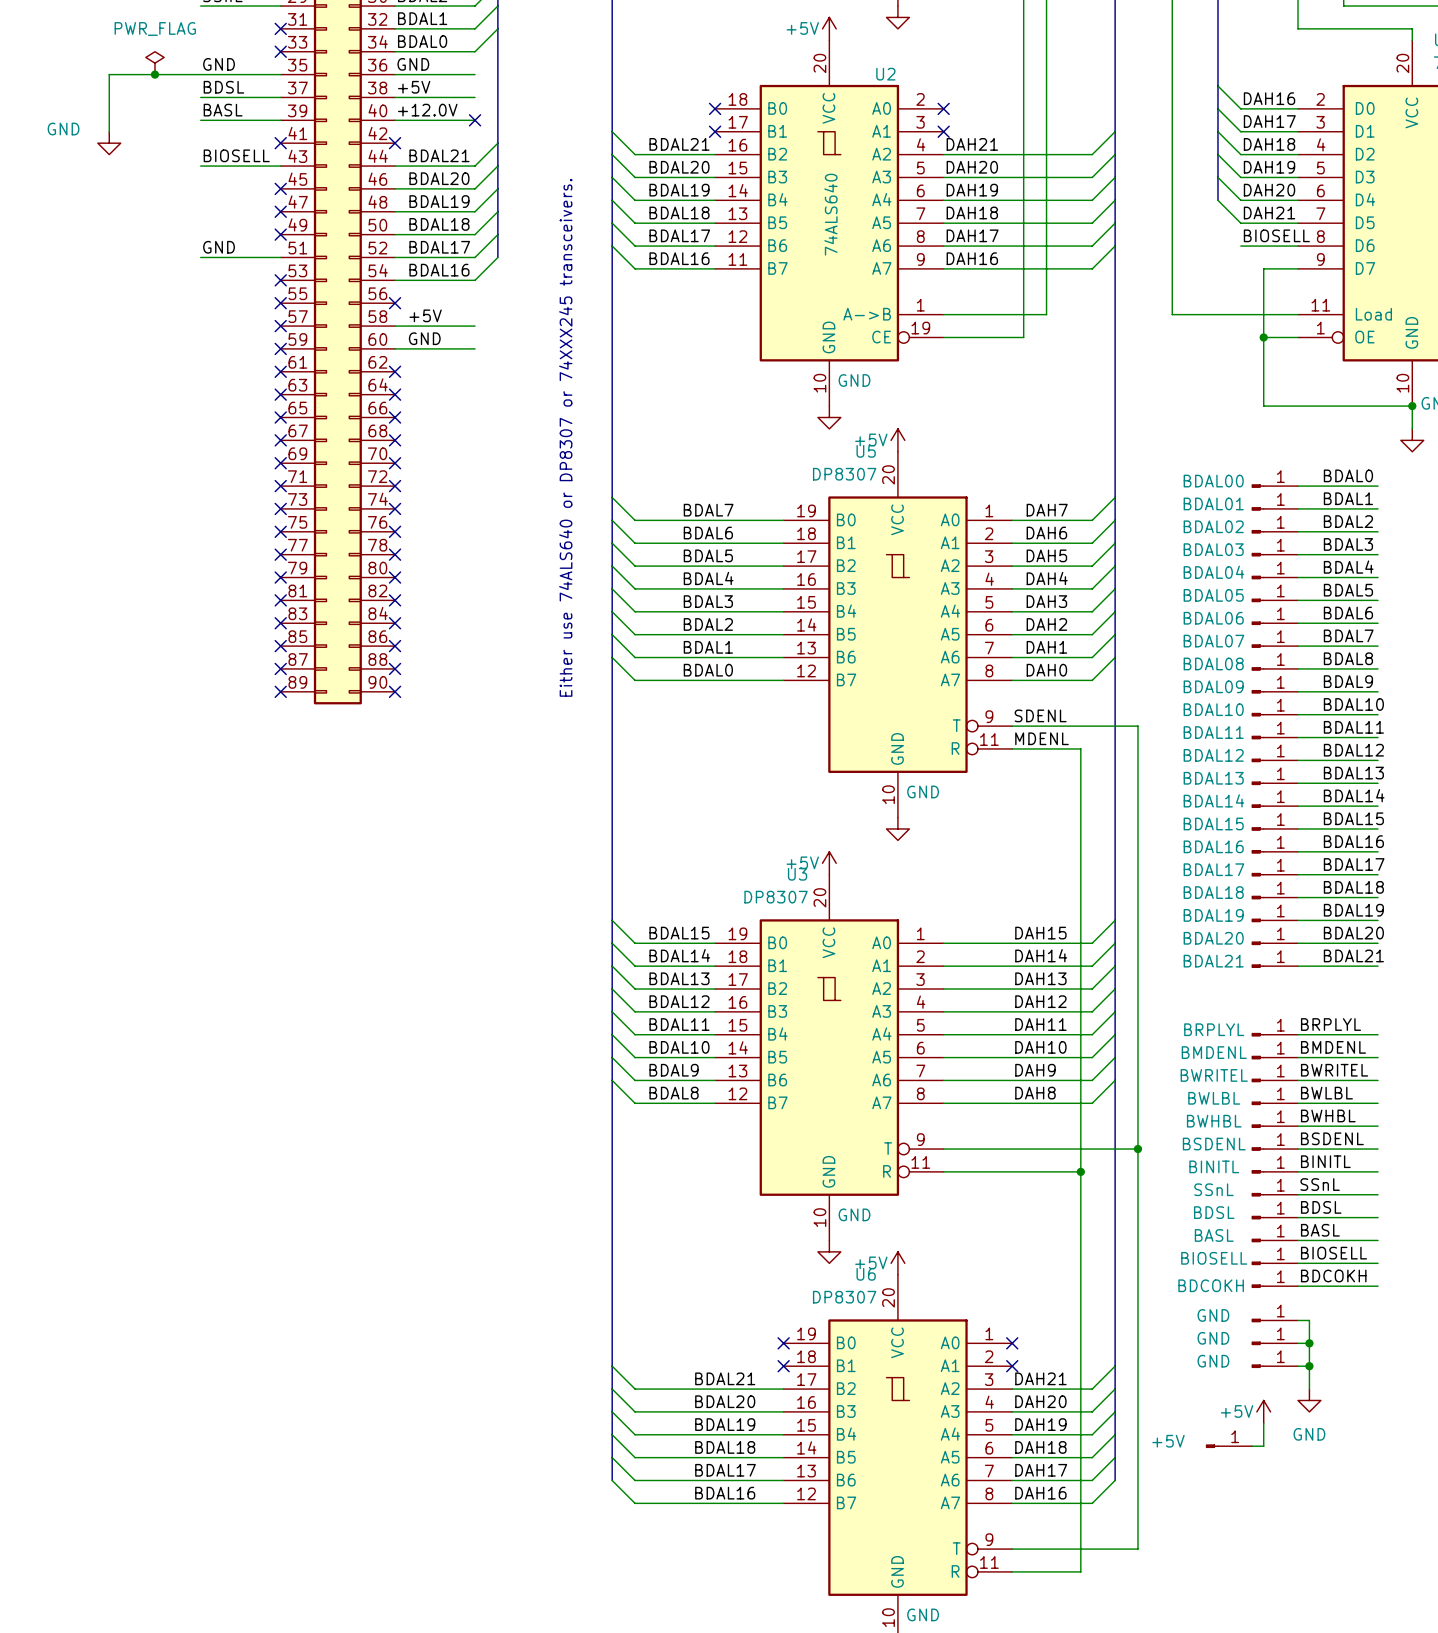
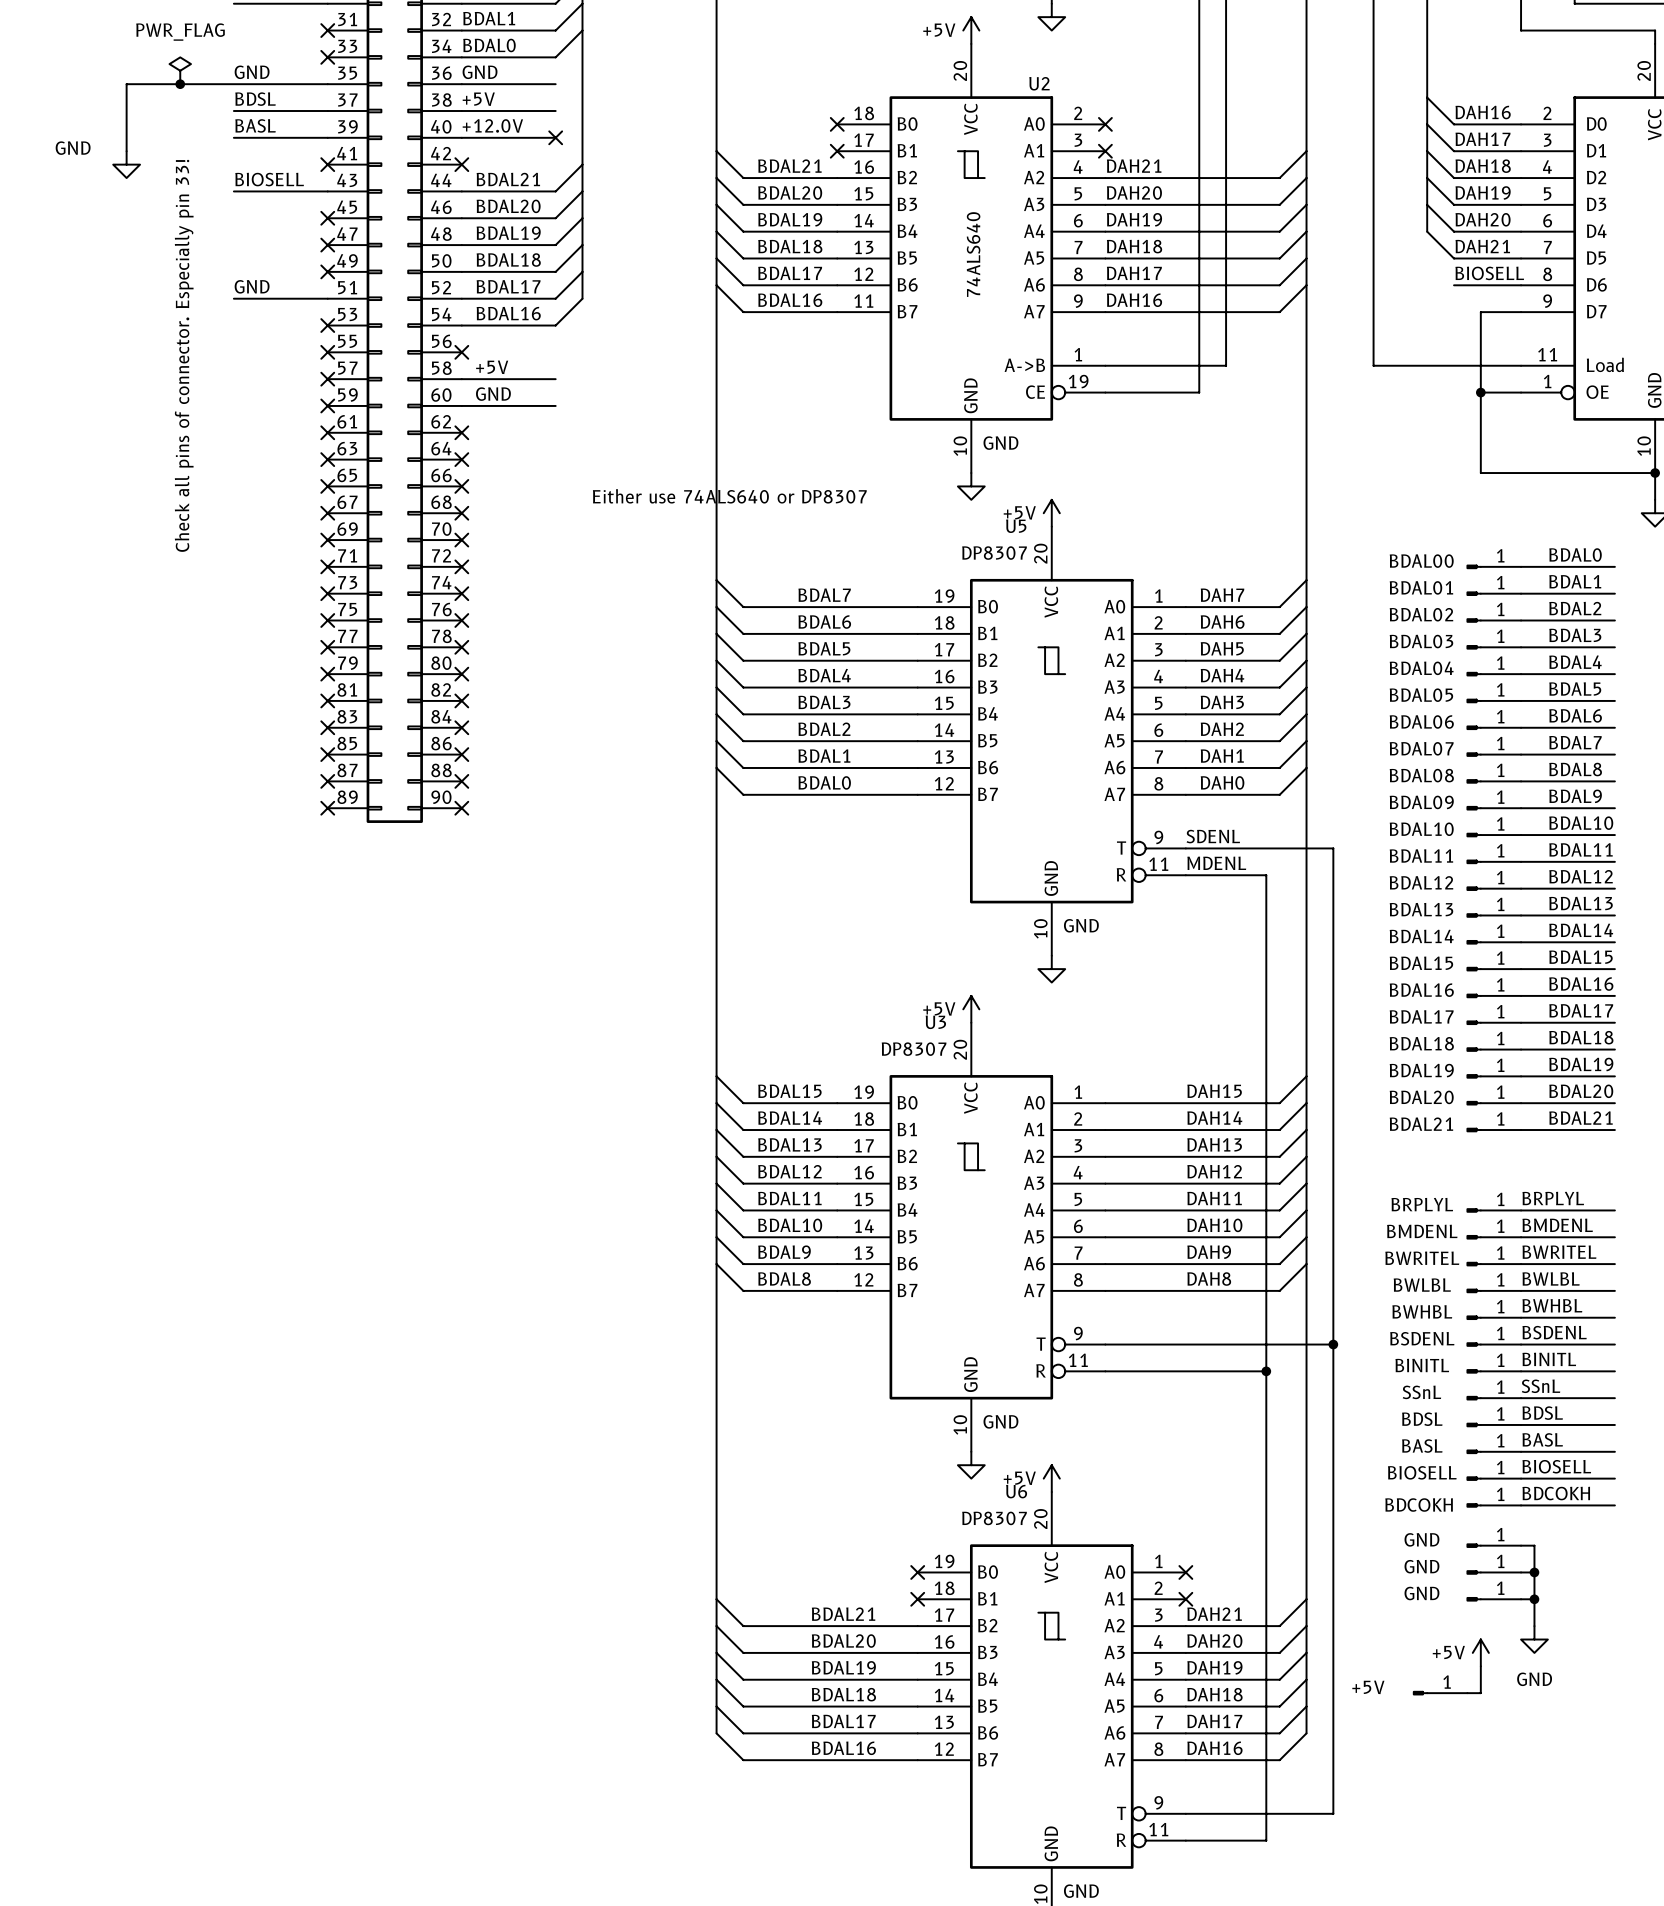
text: none -> Check all pins of connector. Especially pin 33! (184, 355)
text: Either use 74ALS640 or DP8307 or 74XXX245 transceivers. (565, 437) -> Either use 74ALS640 or DP8307 (729, 496)

